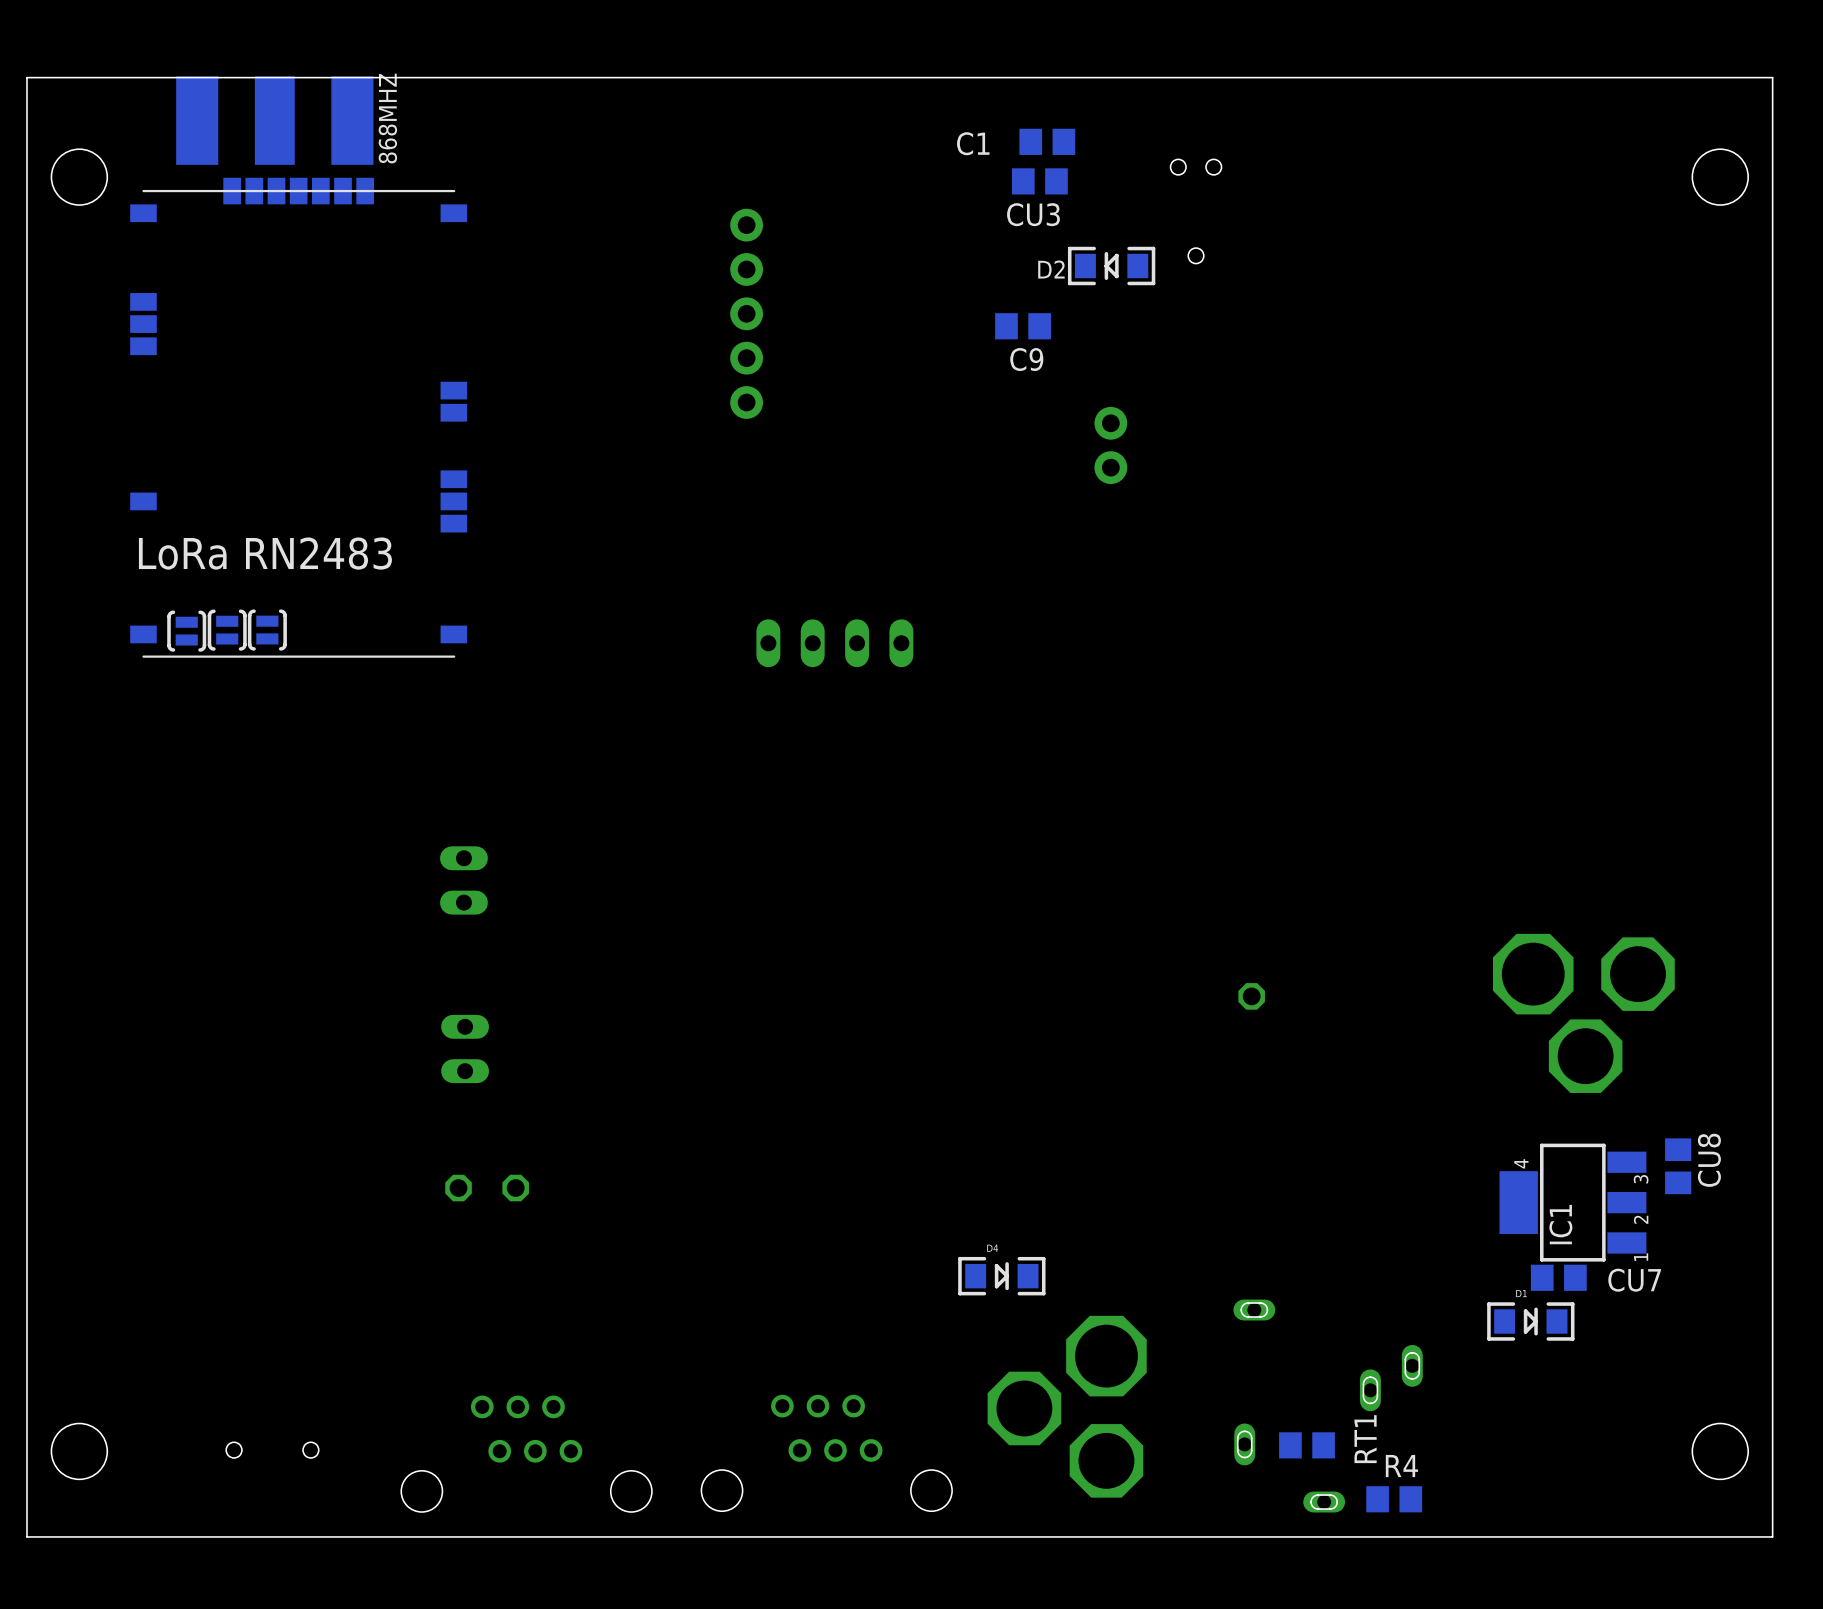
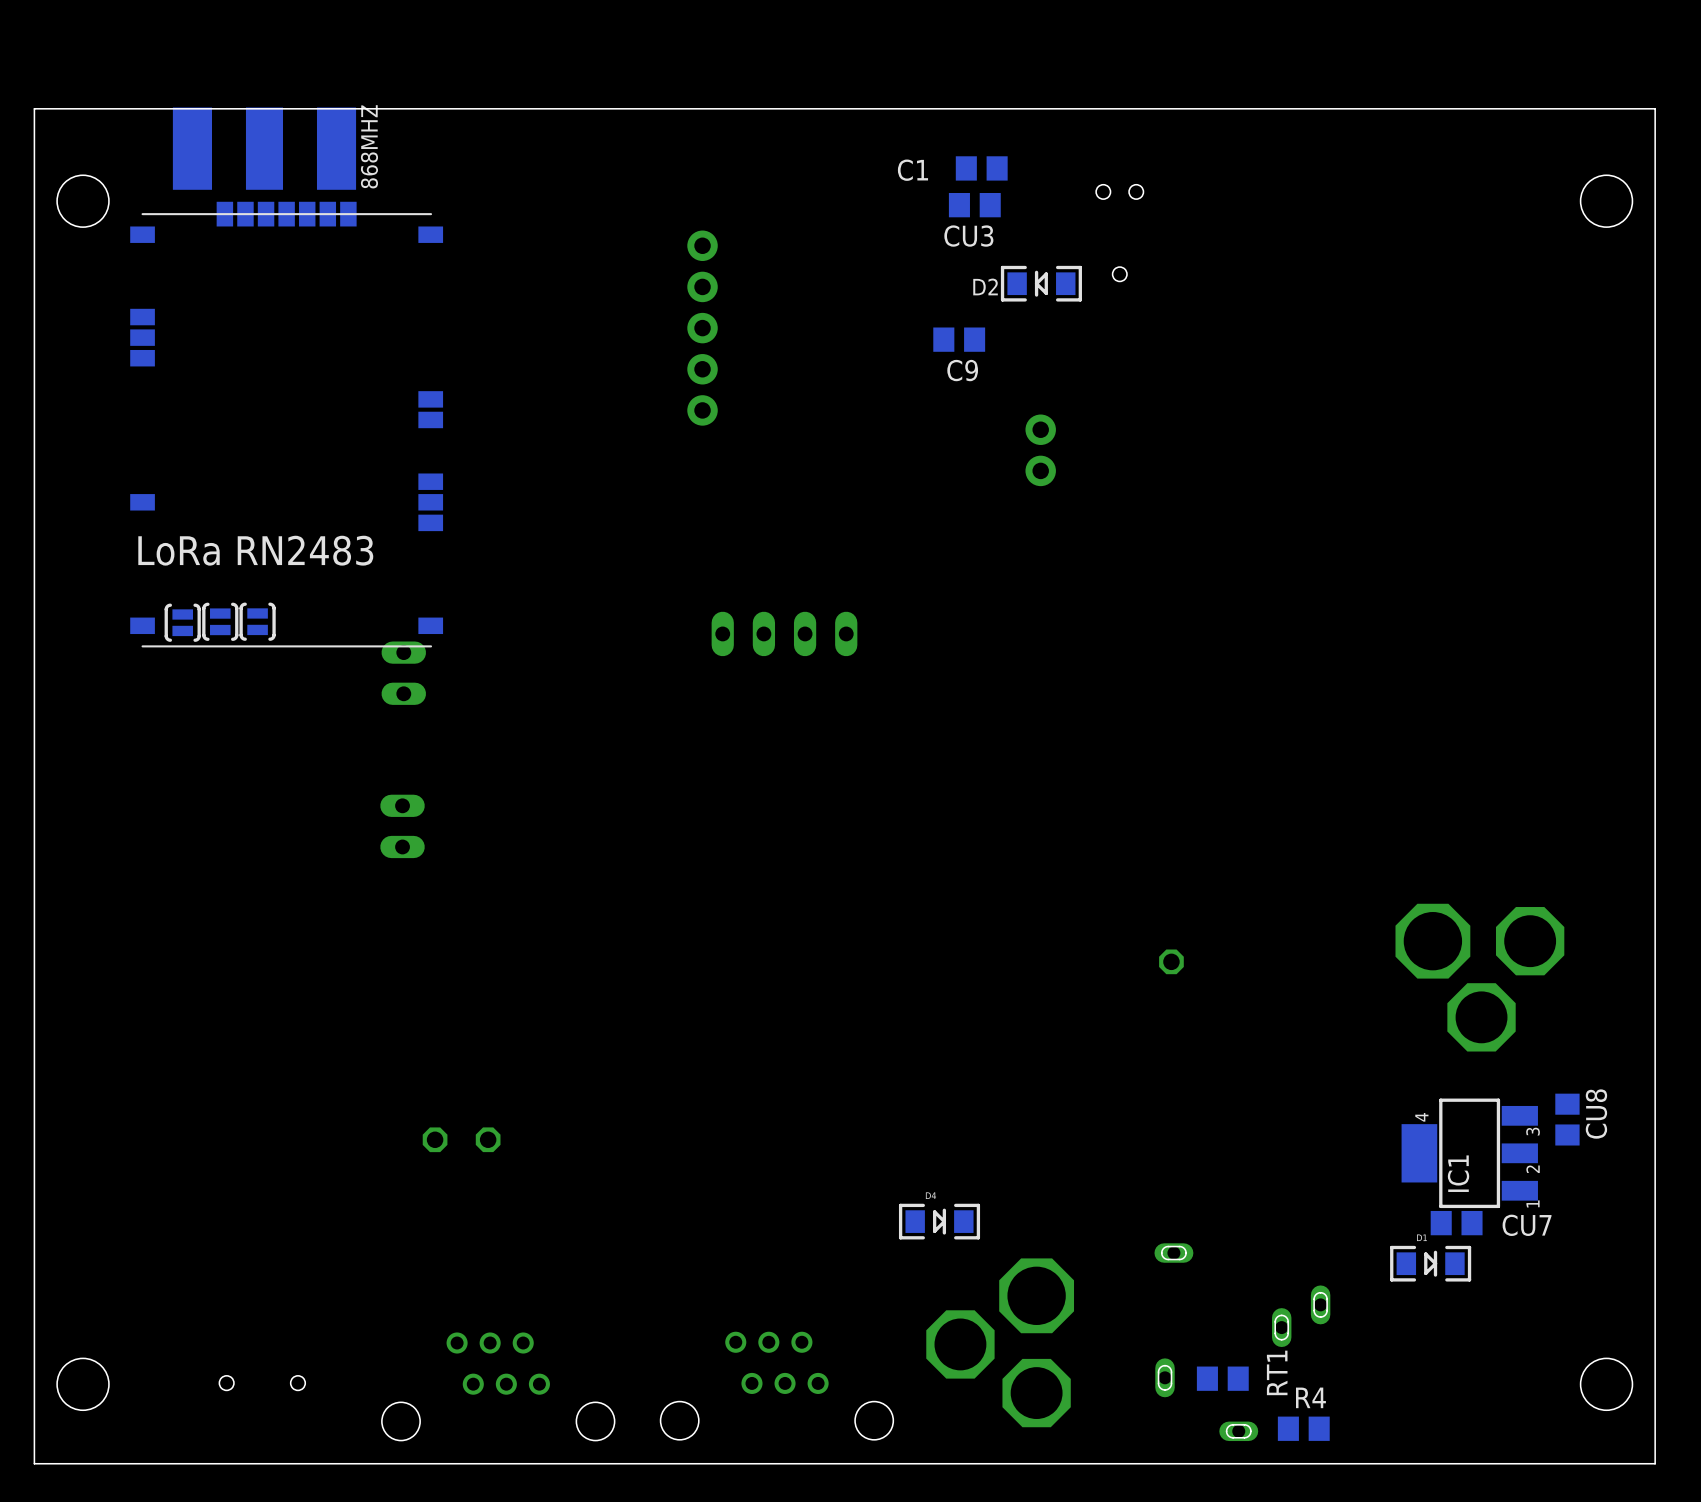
part: none -> (403, 673)
part position: (463, 880) -> (402, 826)
part: (465, 1048) -> none

